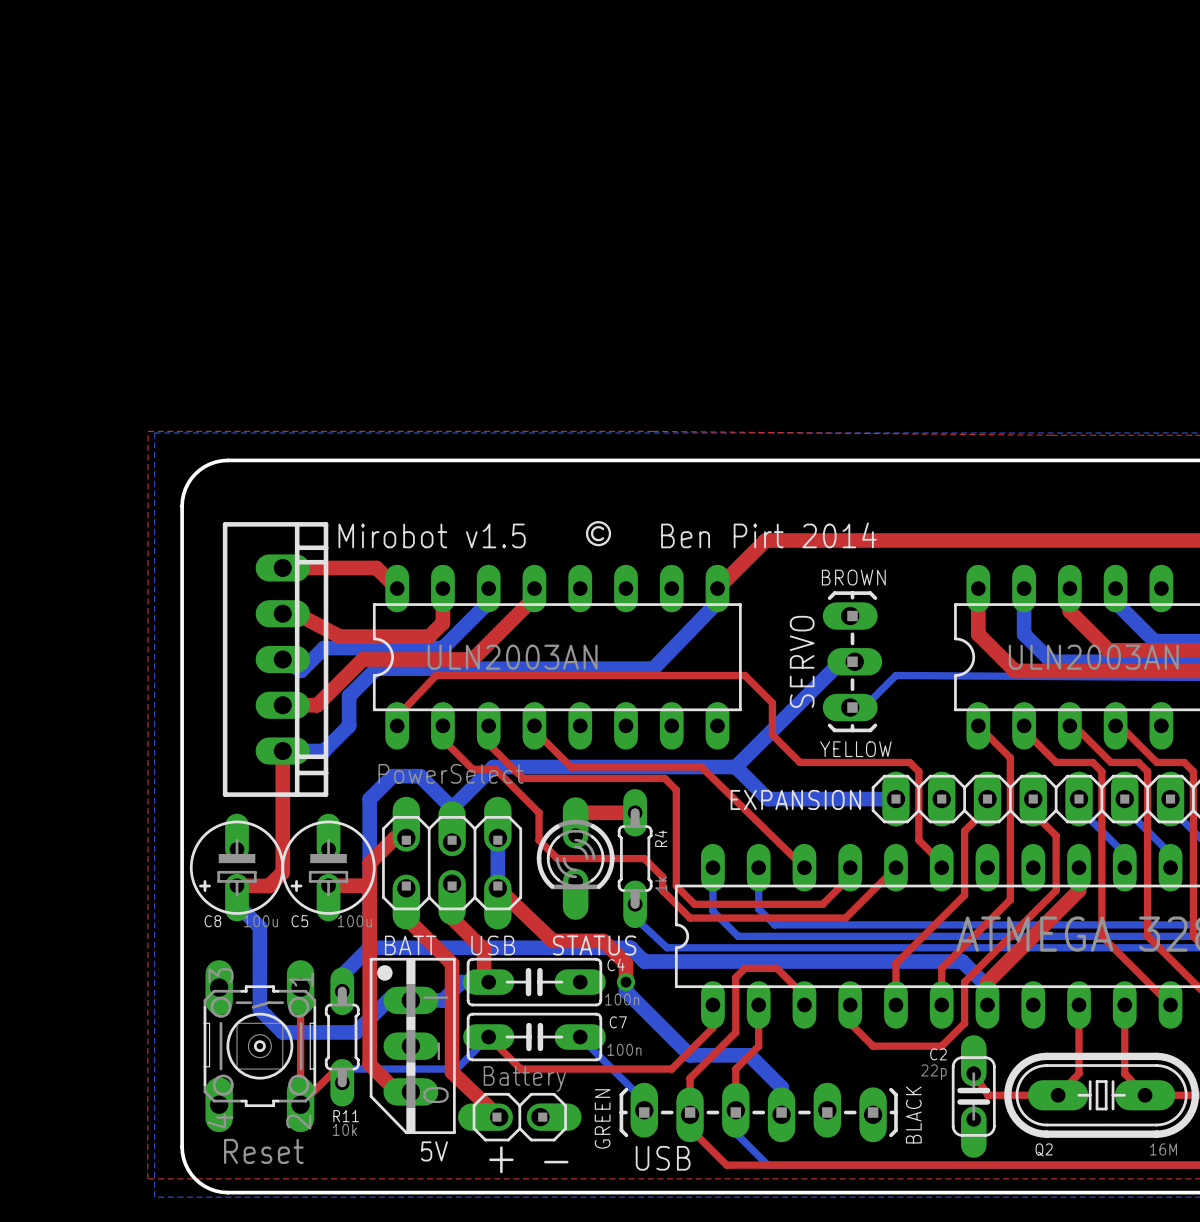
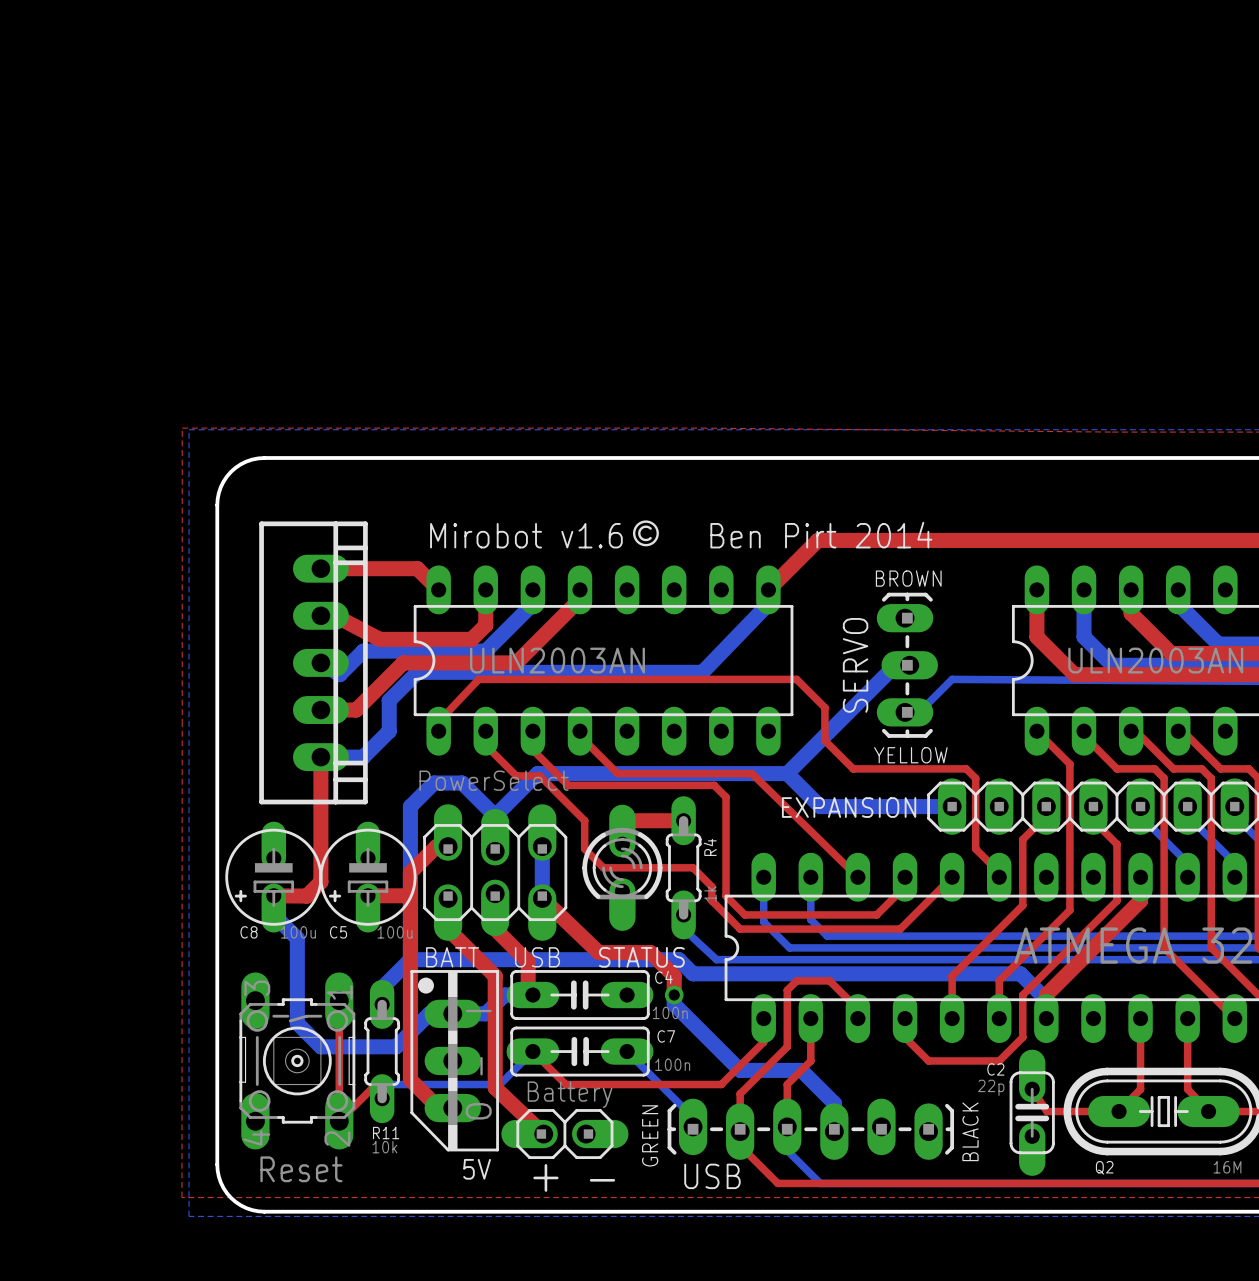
text: Mirobot v1.5 (432, 535) -> Mirobot v1.6 (526, 535)

